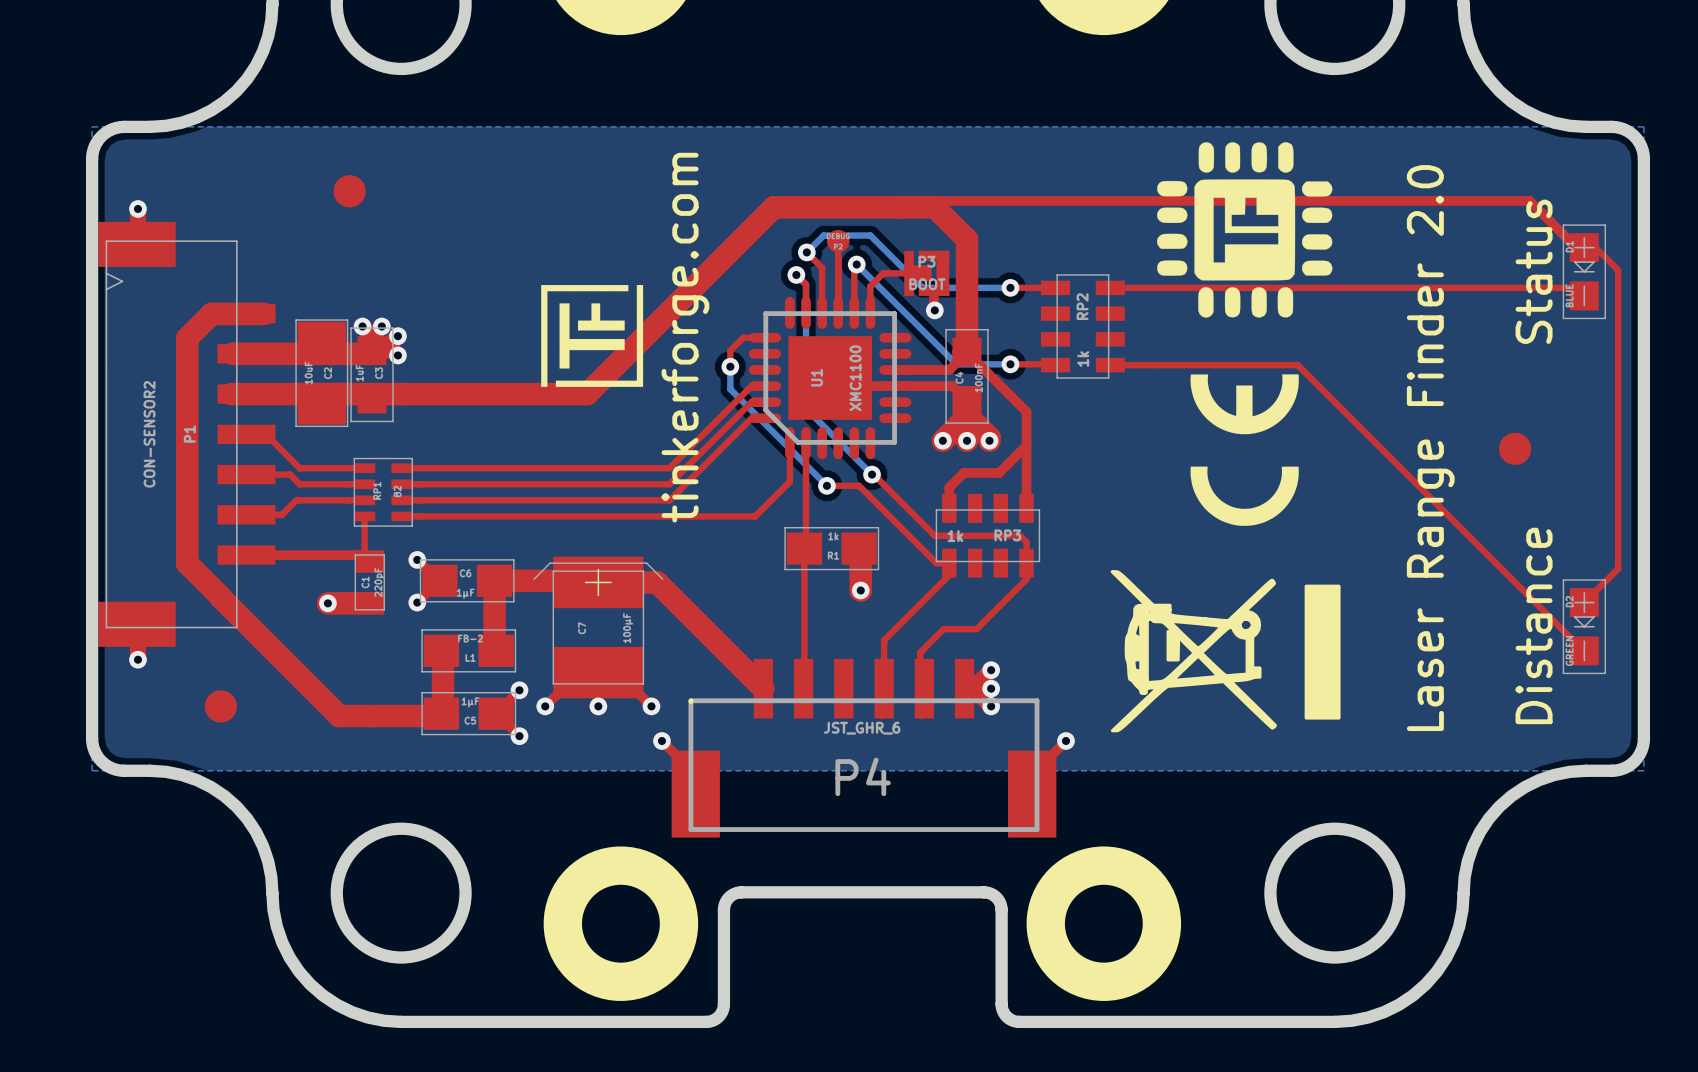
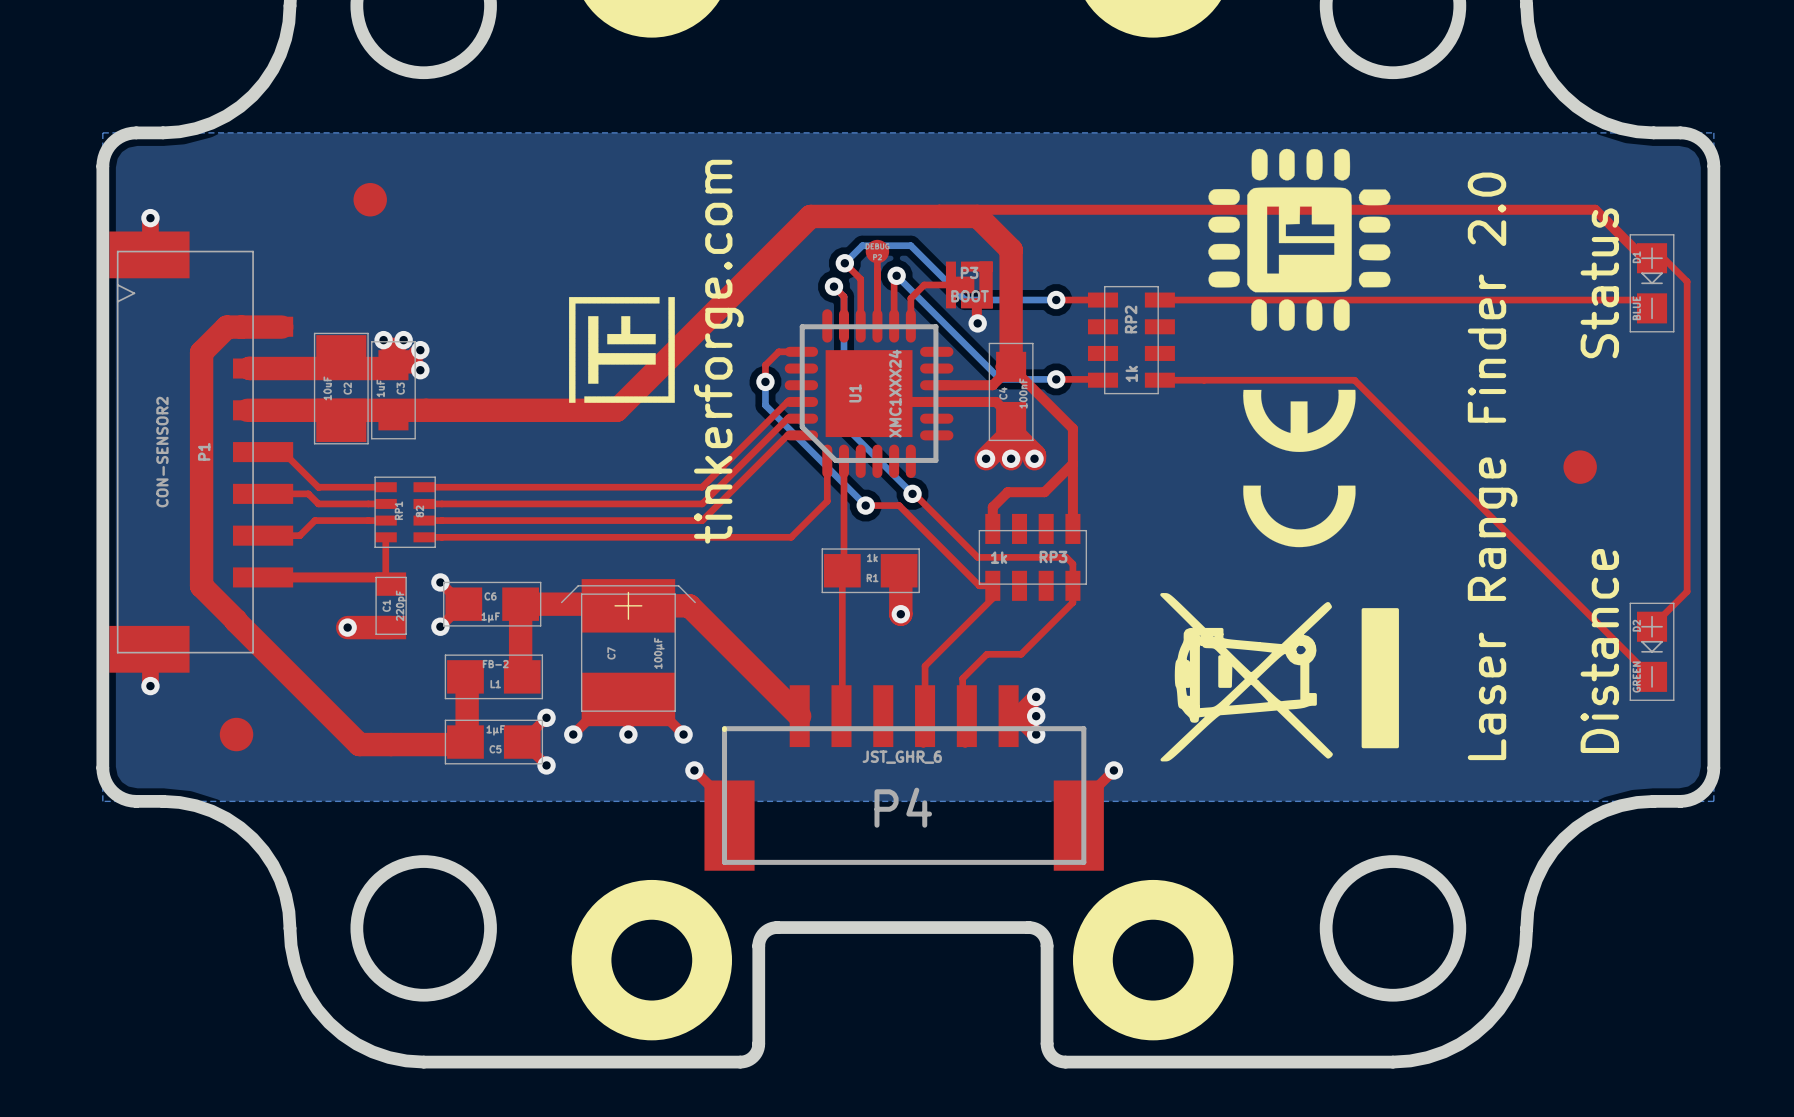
U1 value: XMC1100 (855, 378) -> XMC1XXX24 (895, 393)

